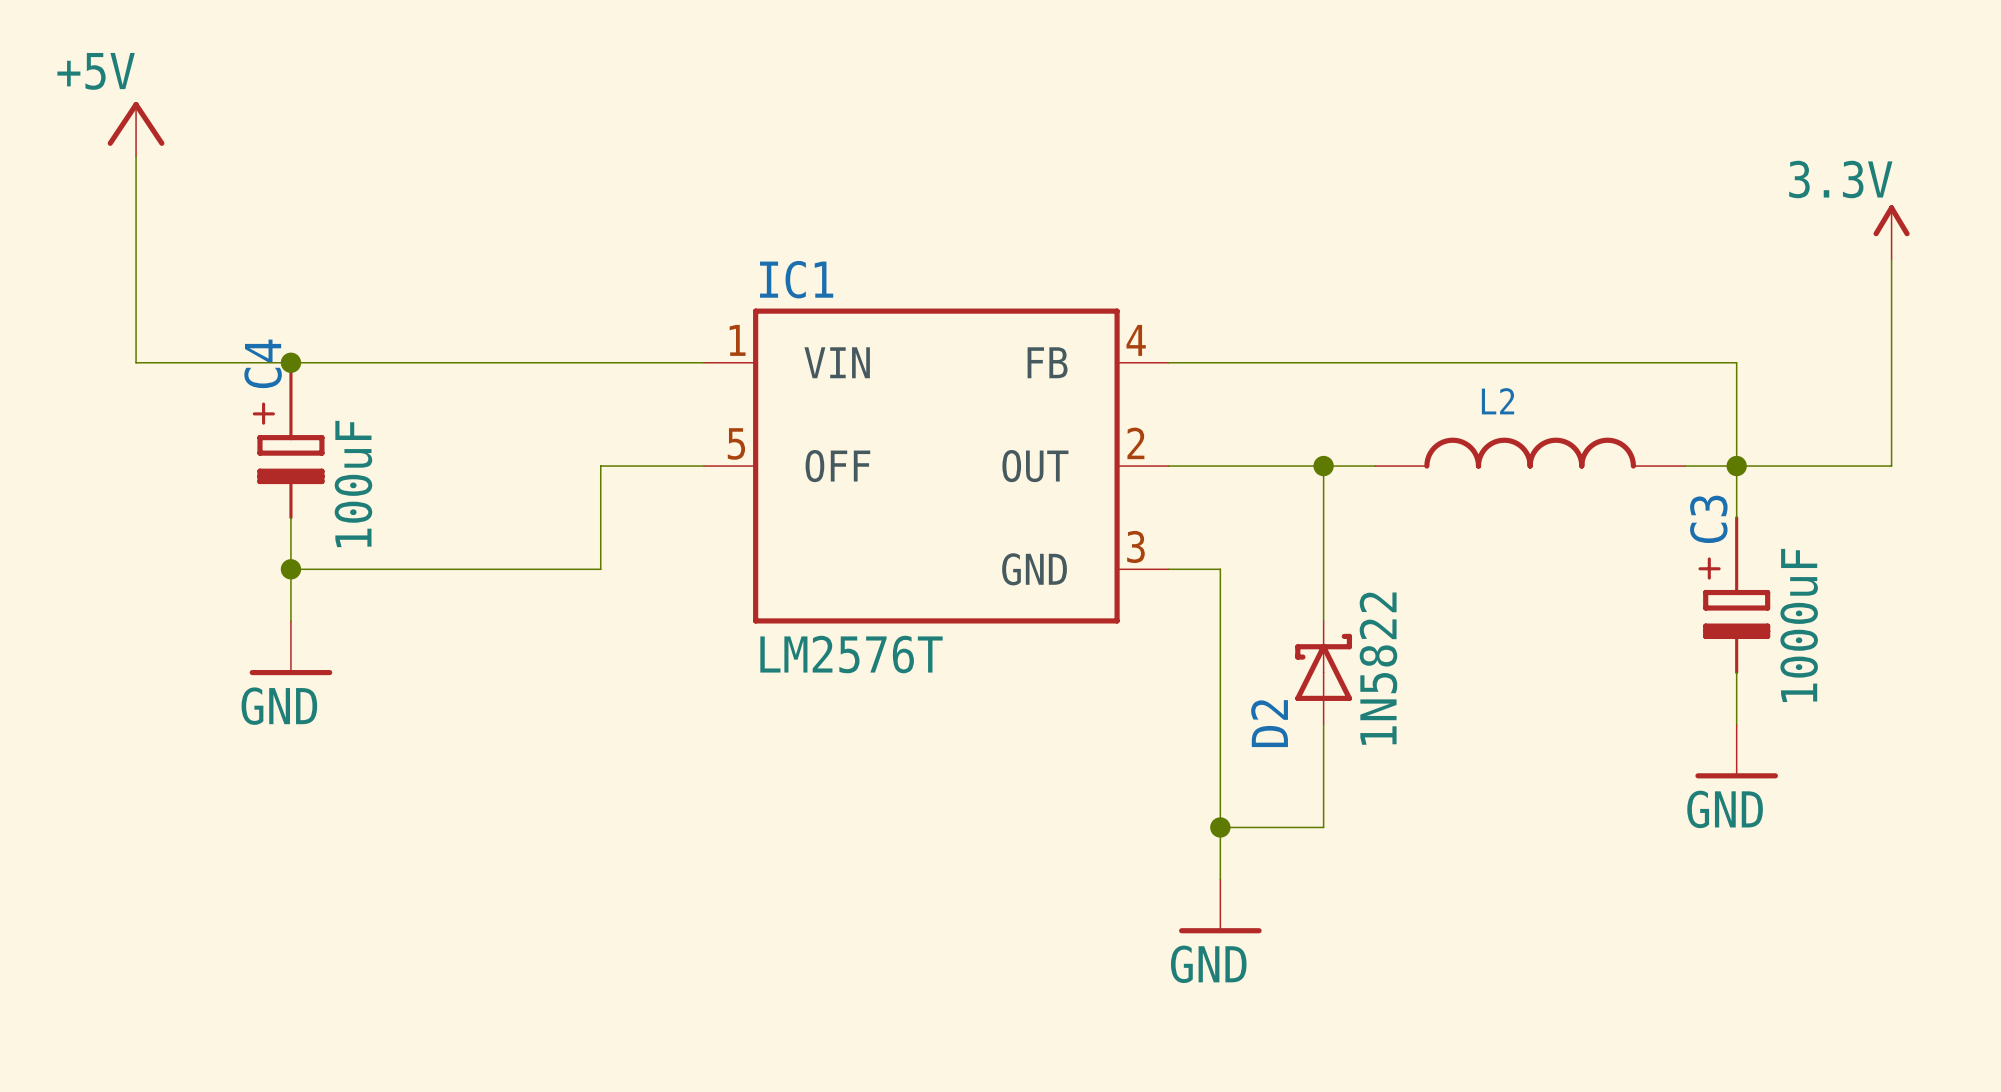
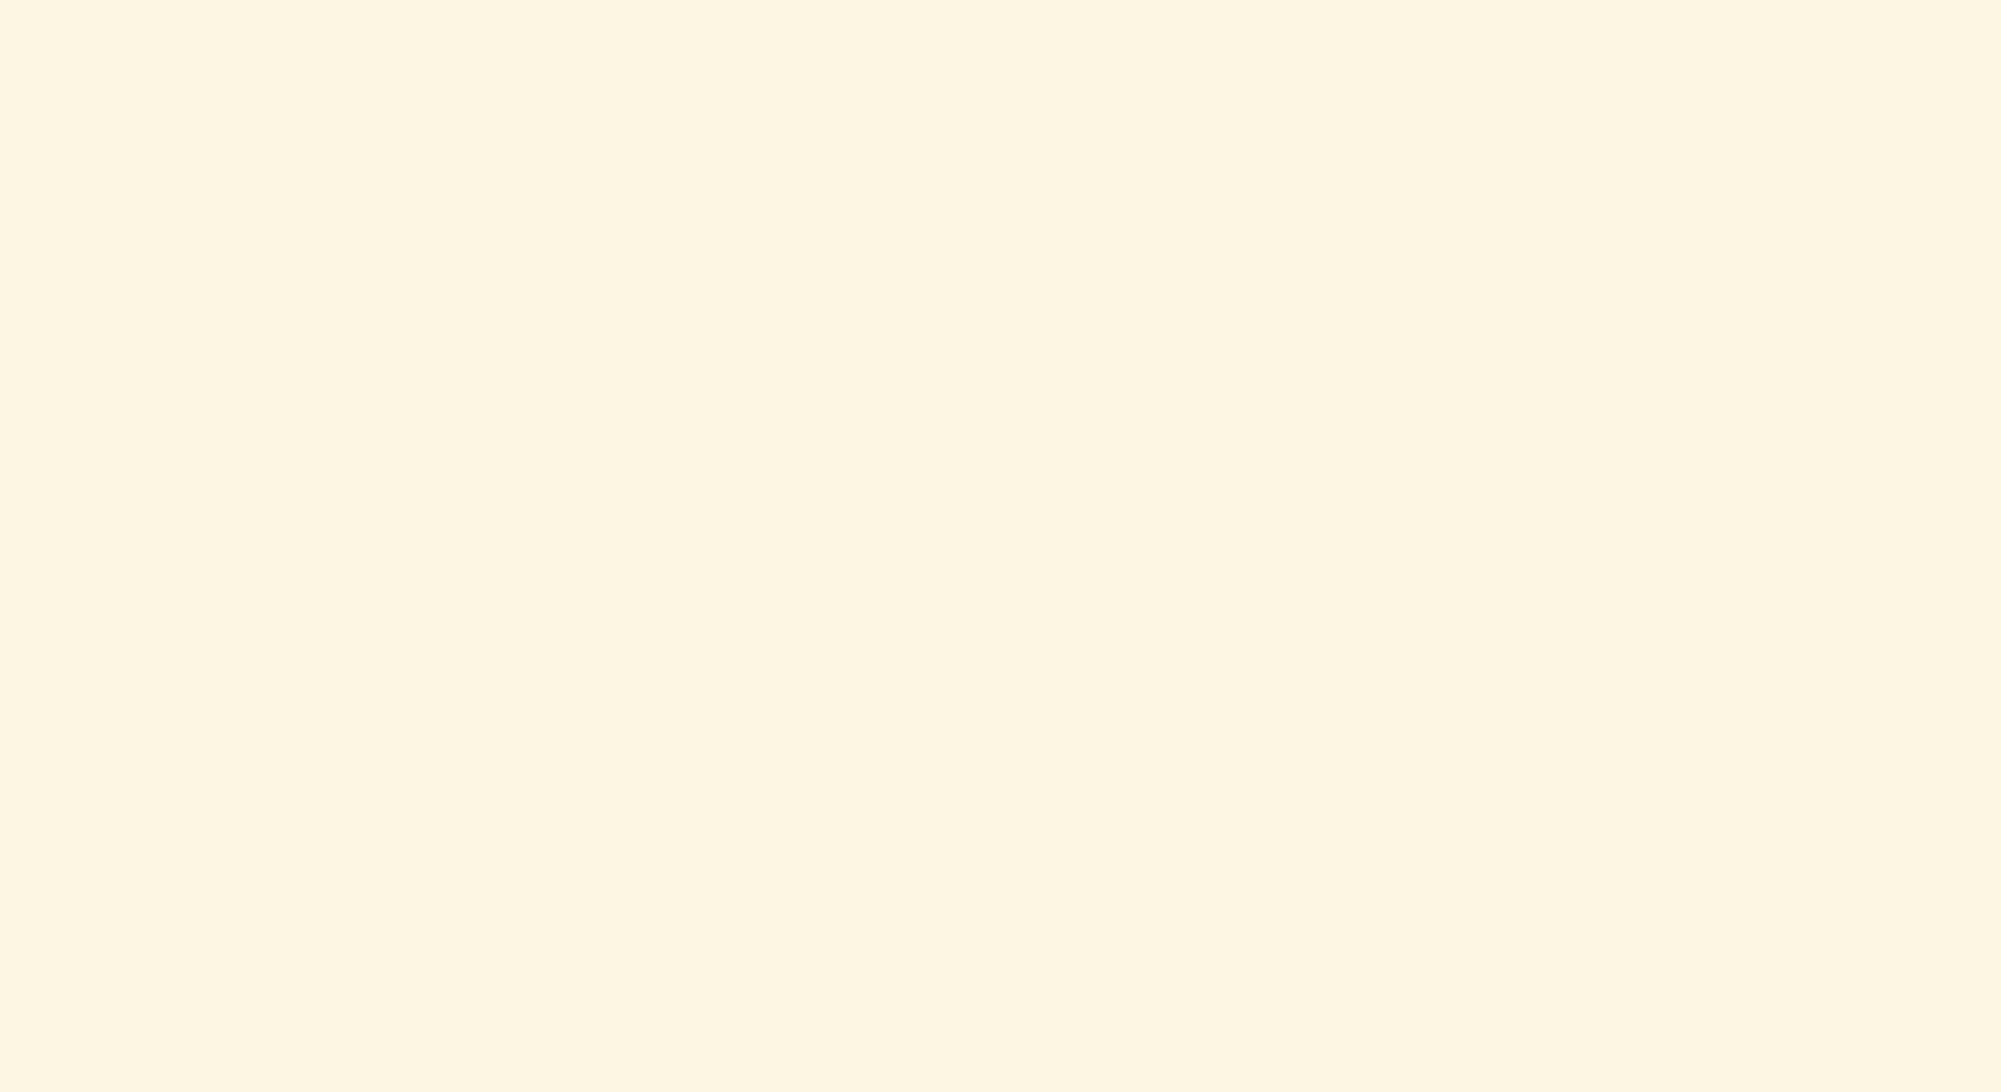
power symbol: +5V (136, 129) -> none
wire: (136, 156) (136, 362) (704, 362) -> none
power symbol: 3.3V (1891, 232) -> none
wire: (1891, 259) (1891, 466) (1685, 466) -> none
junction: (290, 362) -> none
wire: (1168, 362) (1736, 362) (1736, 517) -> none
C4: 100uF (288, 440) -> none
L2: (1530, 453) -> none
wire: (704, 466) (600, 466) (600, 569) (290, 569) -> none
IC1: LM2576T (936, 466) -> none
wire: (1168, 466) (1375, 466) -> none
wire: (1323, 466) (1323, 620) -> none
junction: (1323, 466) -> none
junction: (1736, 466) -> none
wire: (290, 517) (290, 620) -> none
junction: (290, 569) -> none
wire: (1168, 569) (1220, 569) (1220, 879) -> none
C3: 1000uF (1734, 595) -> none
power symbol: GND (290, 648) -> none
D2: 1N5822 (1323, 672) -> none
wire: (1736, 672) (1736, 724) -> none
wire: (1323, 724) (1323, 827) (1220, 827) -> none
power symbol: GND (1736, 751) -> none
junction: (1220, 827) -> none
power symbol: GND (1220, 906) -> none

